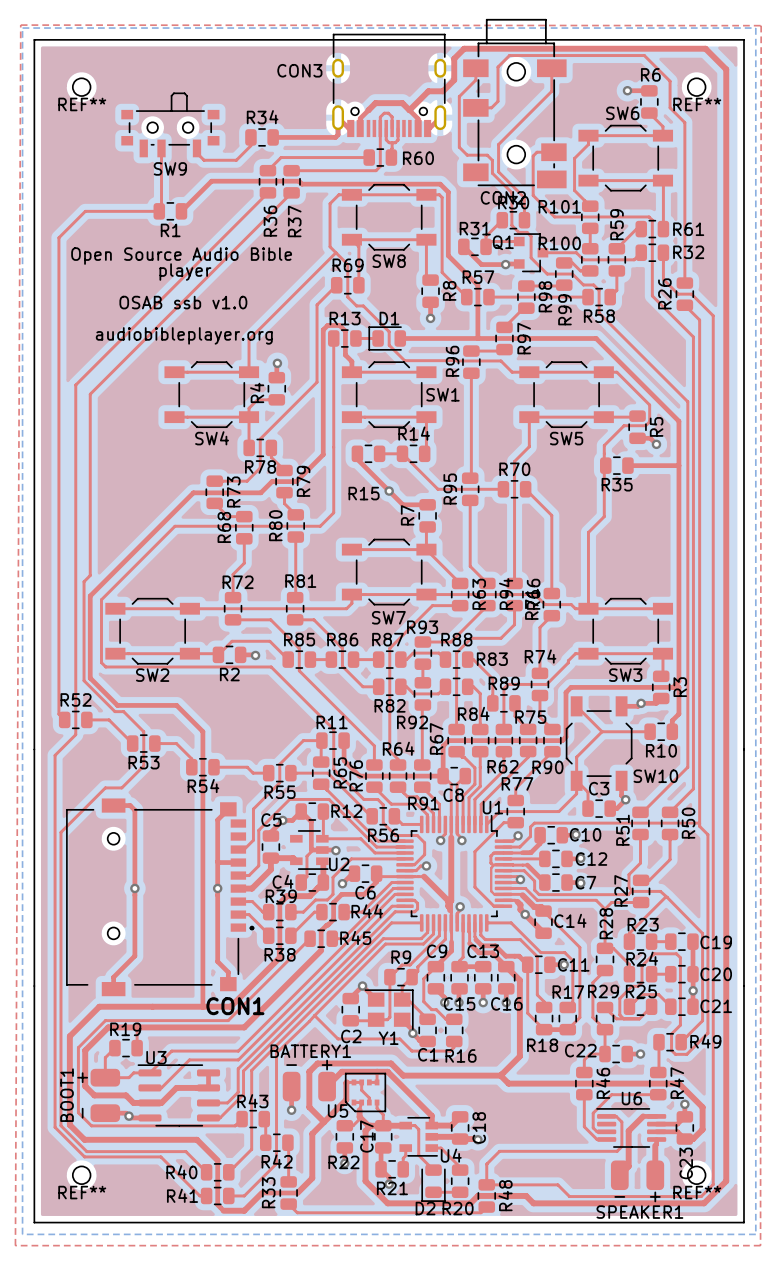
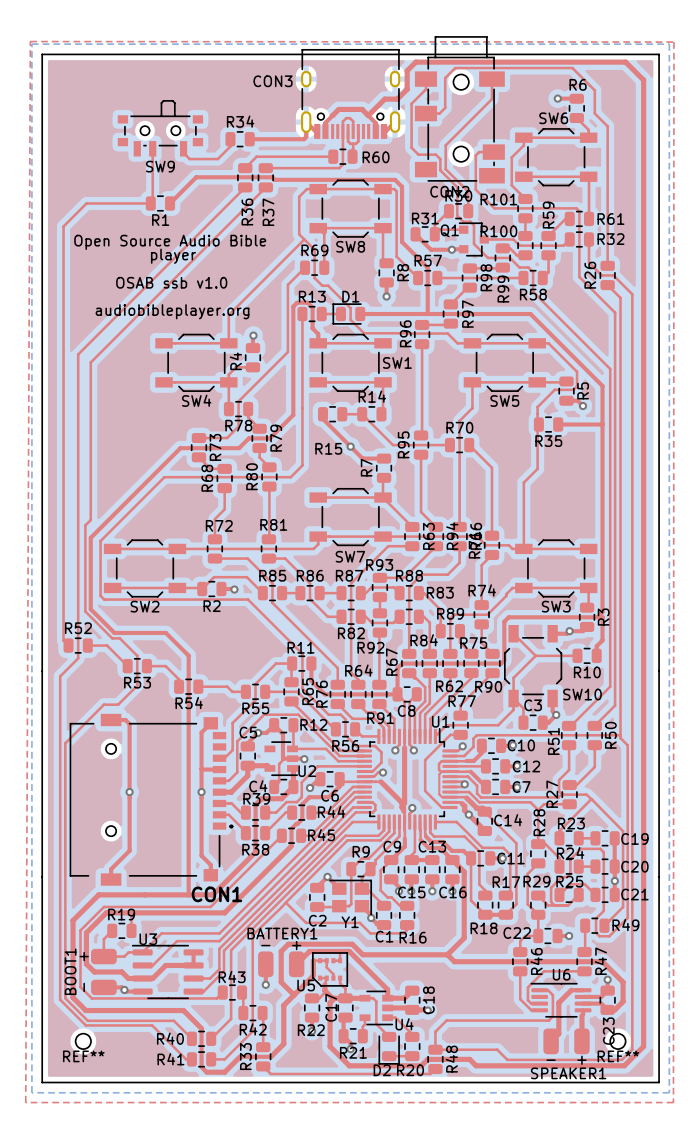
REF**: (81, 87) -> none
REF**: (696, 87) -> none

